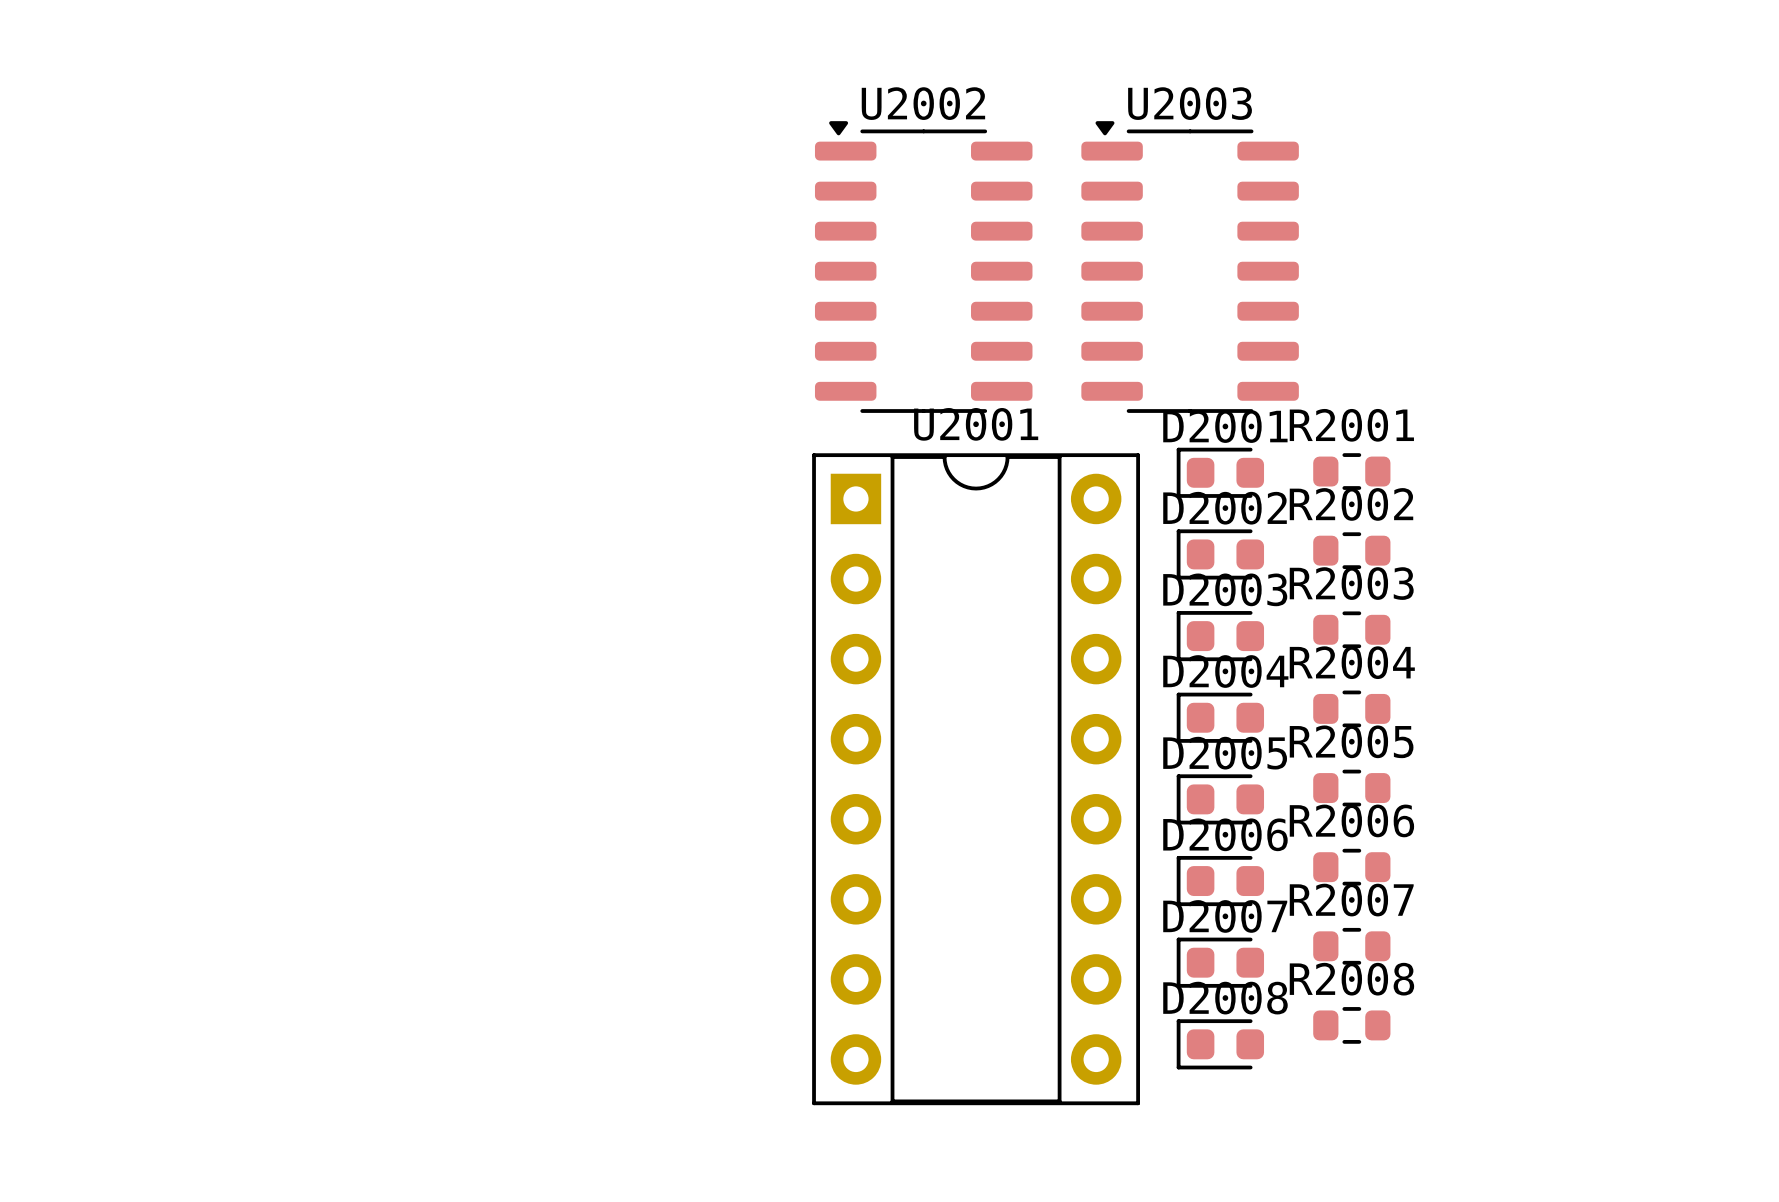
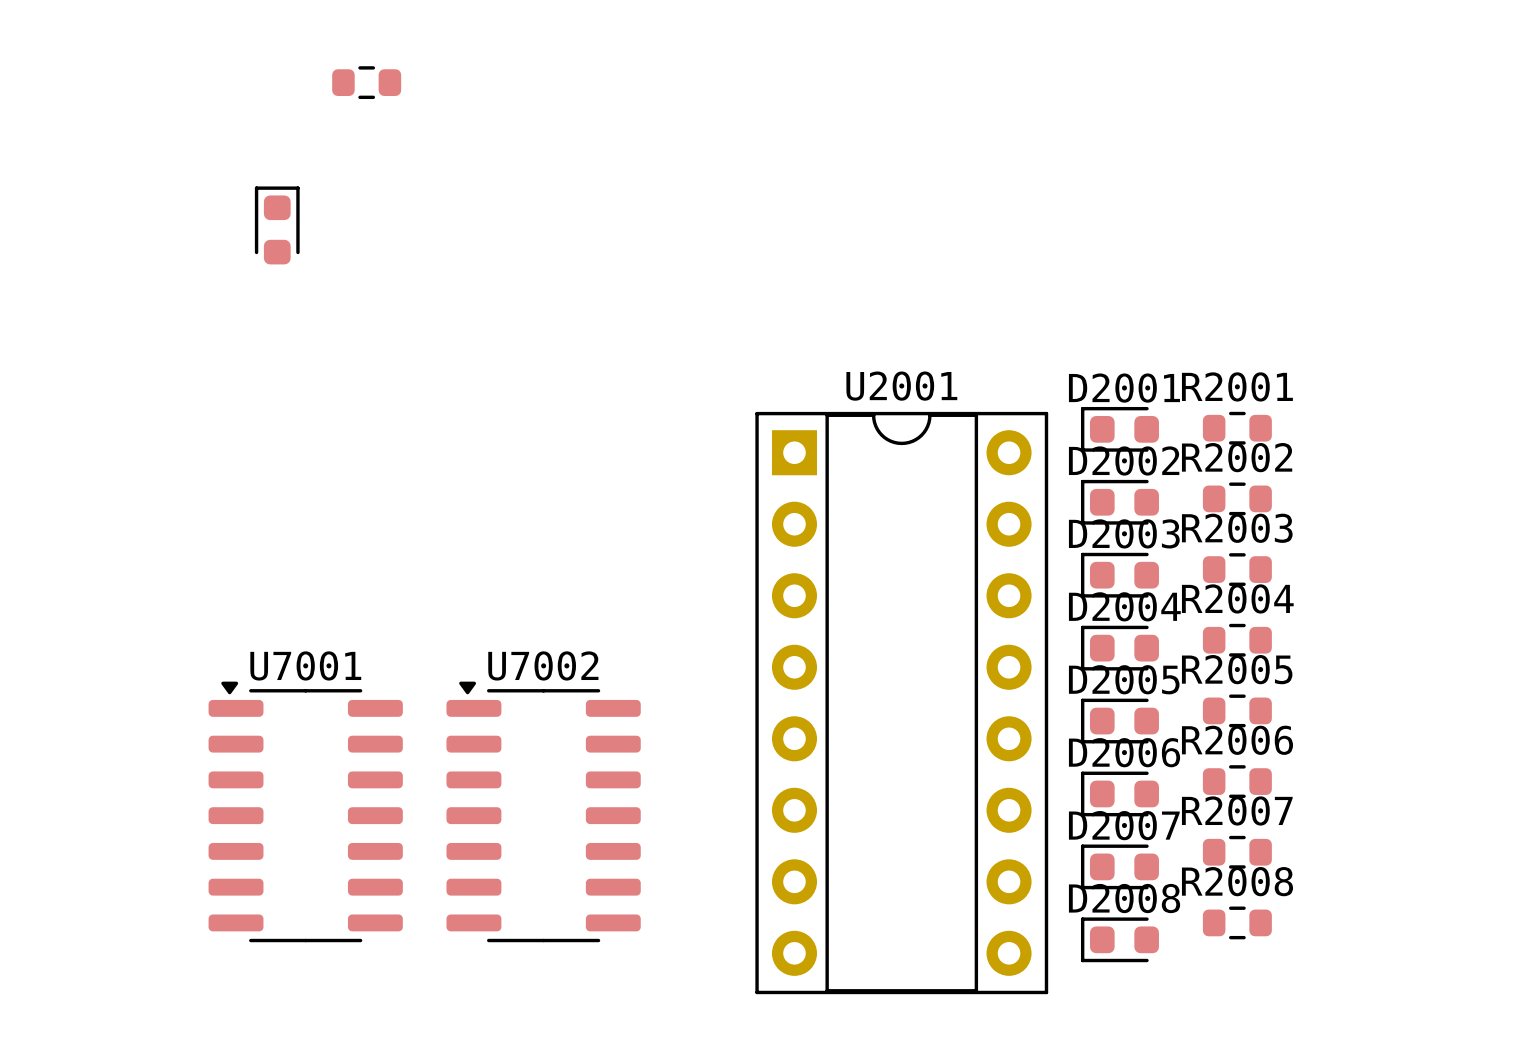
part: none -> (366, 82)
part: none -> (277, 225)
U2002: (923, 267) -> none
U2003: (1190, 267) -> none
U7001: none -> (305, 811)
U7002: none -> (543, 811)

